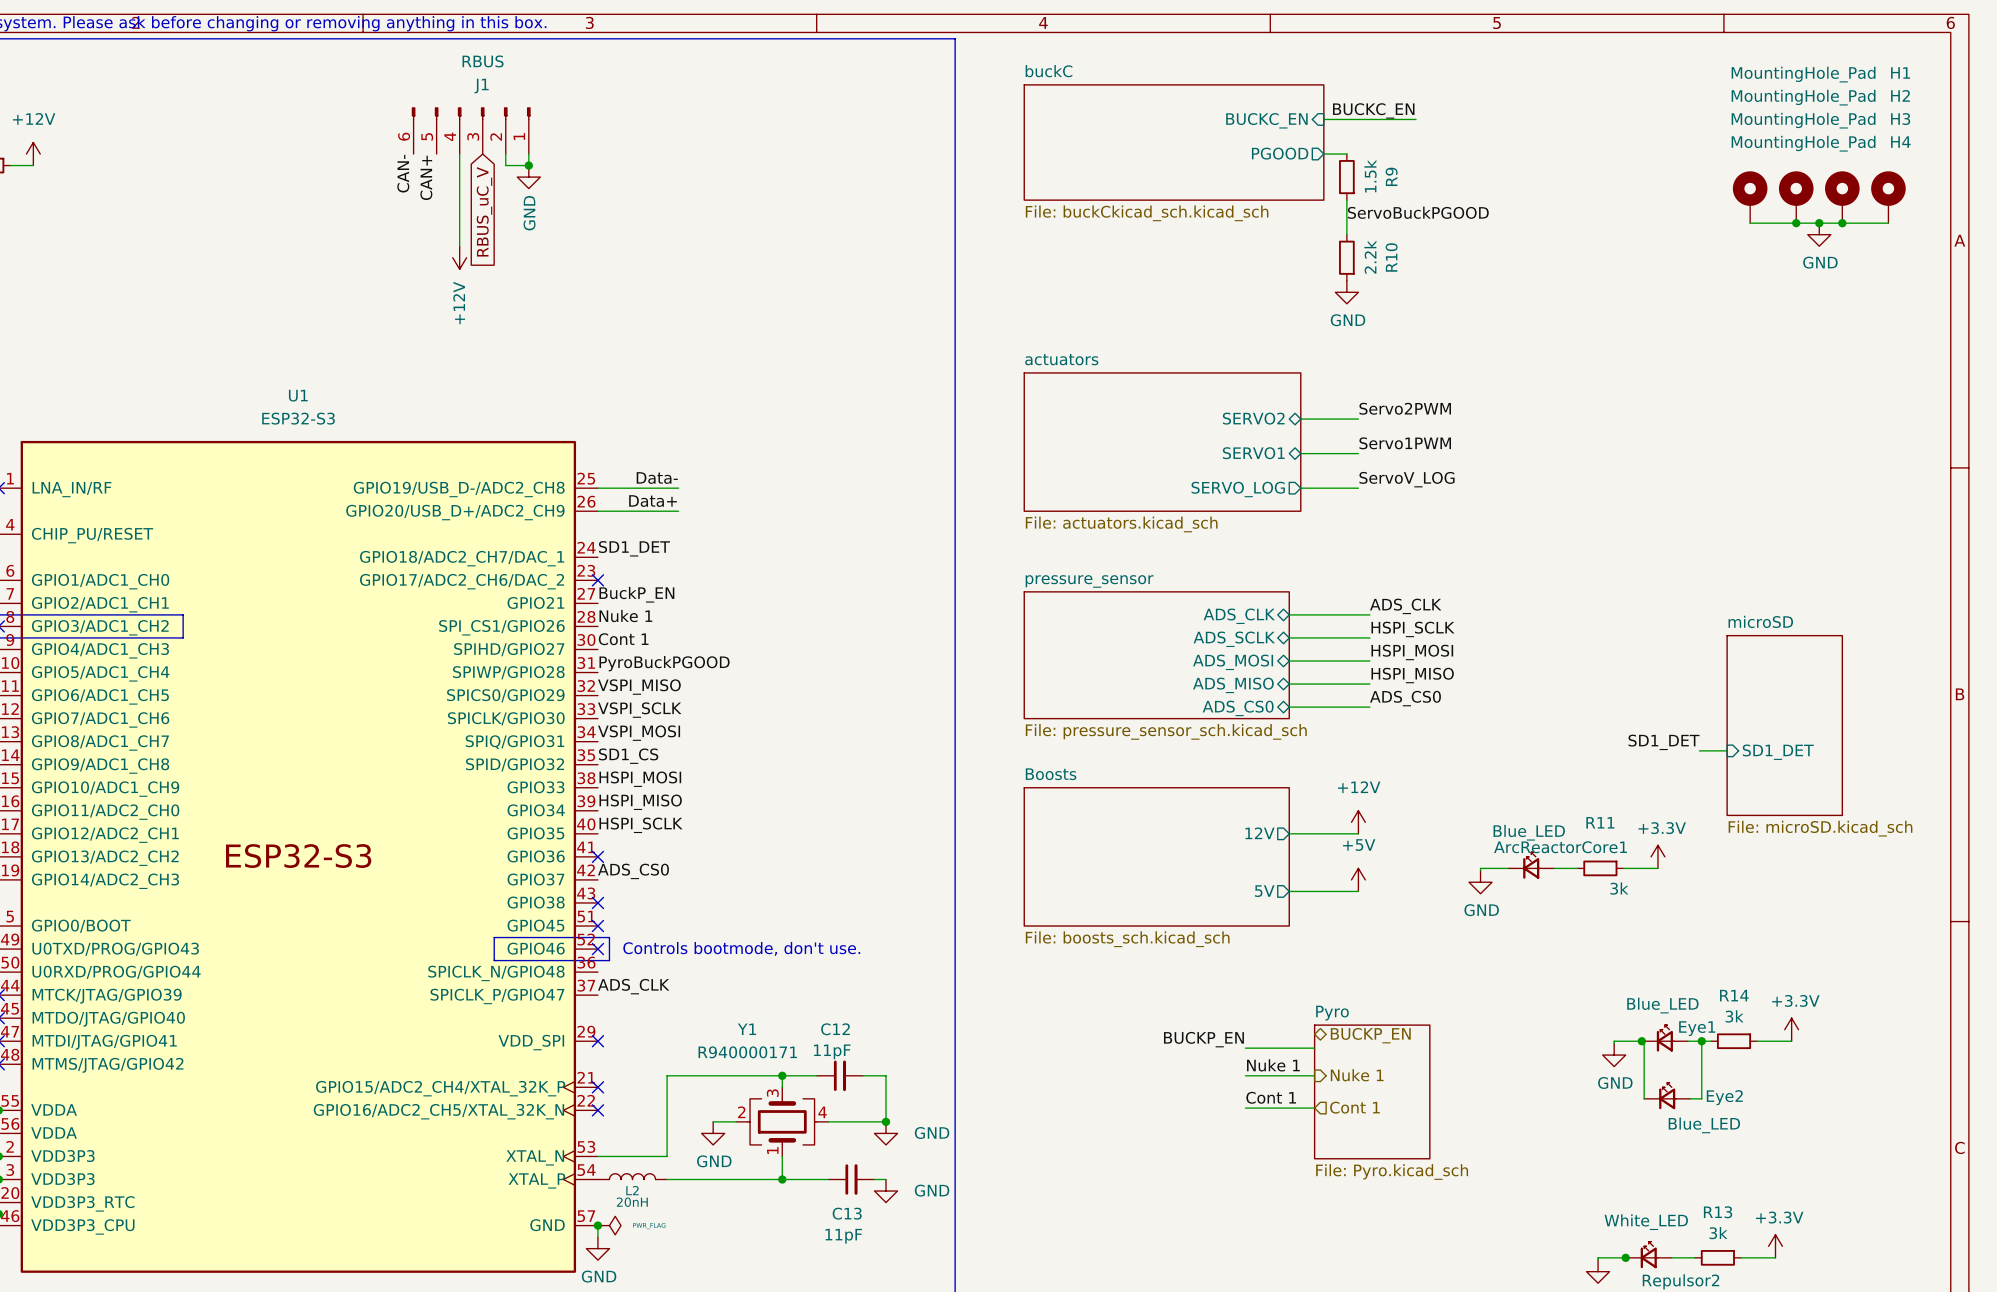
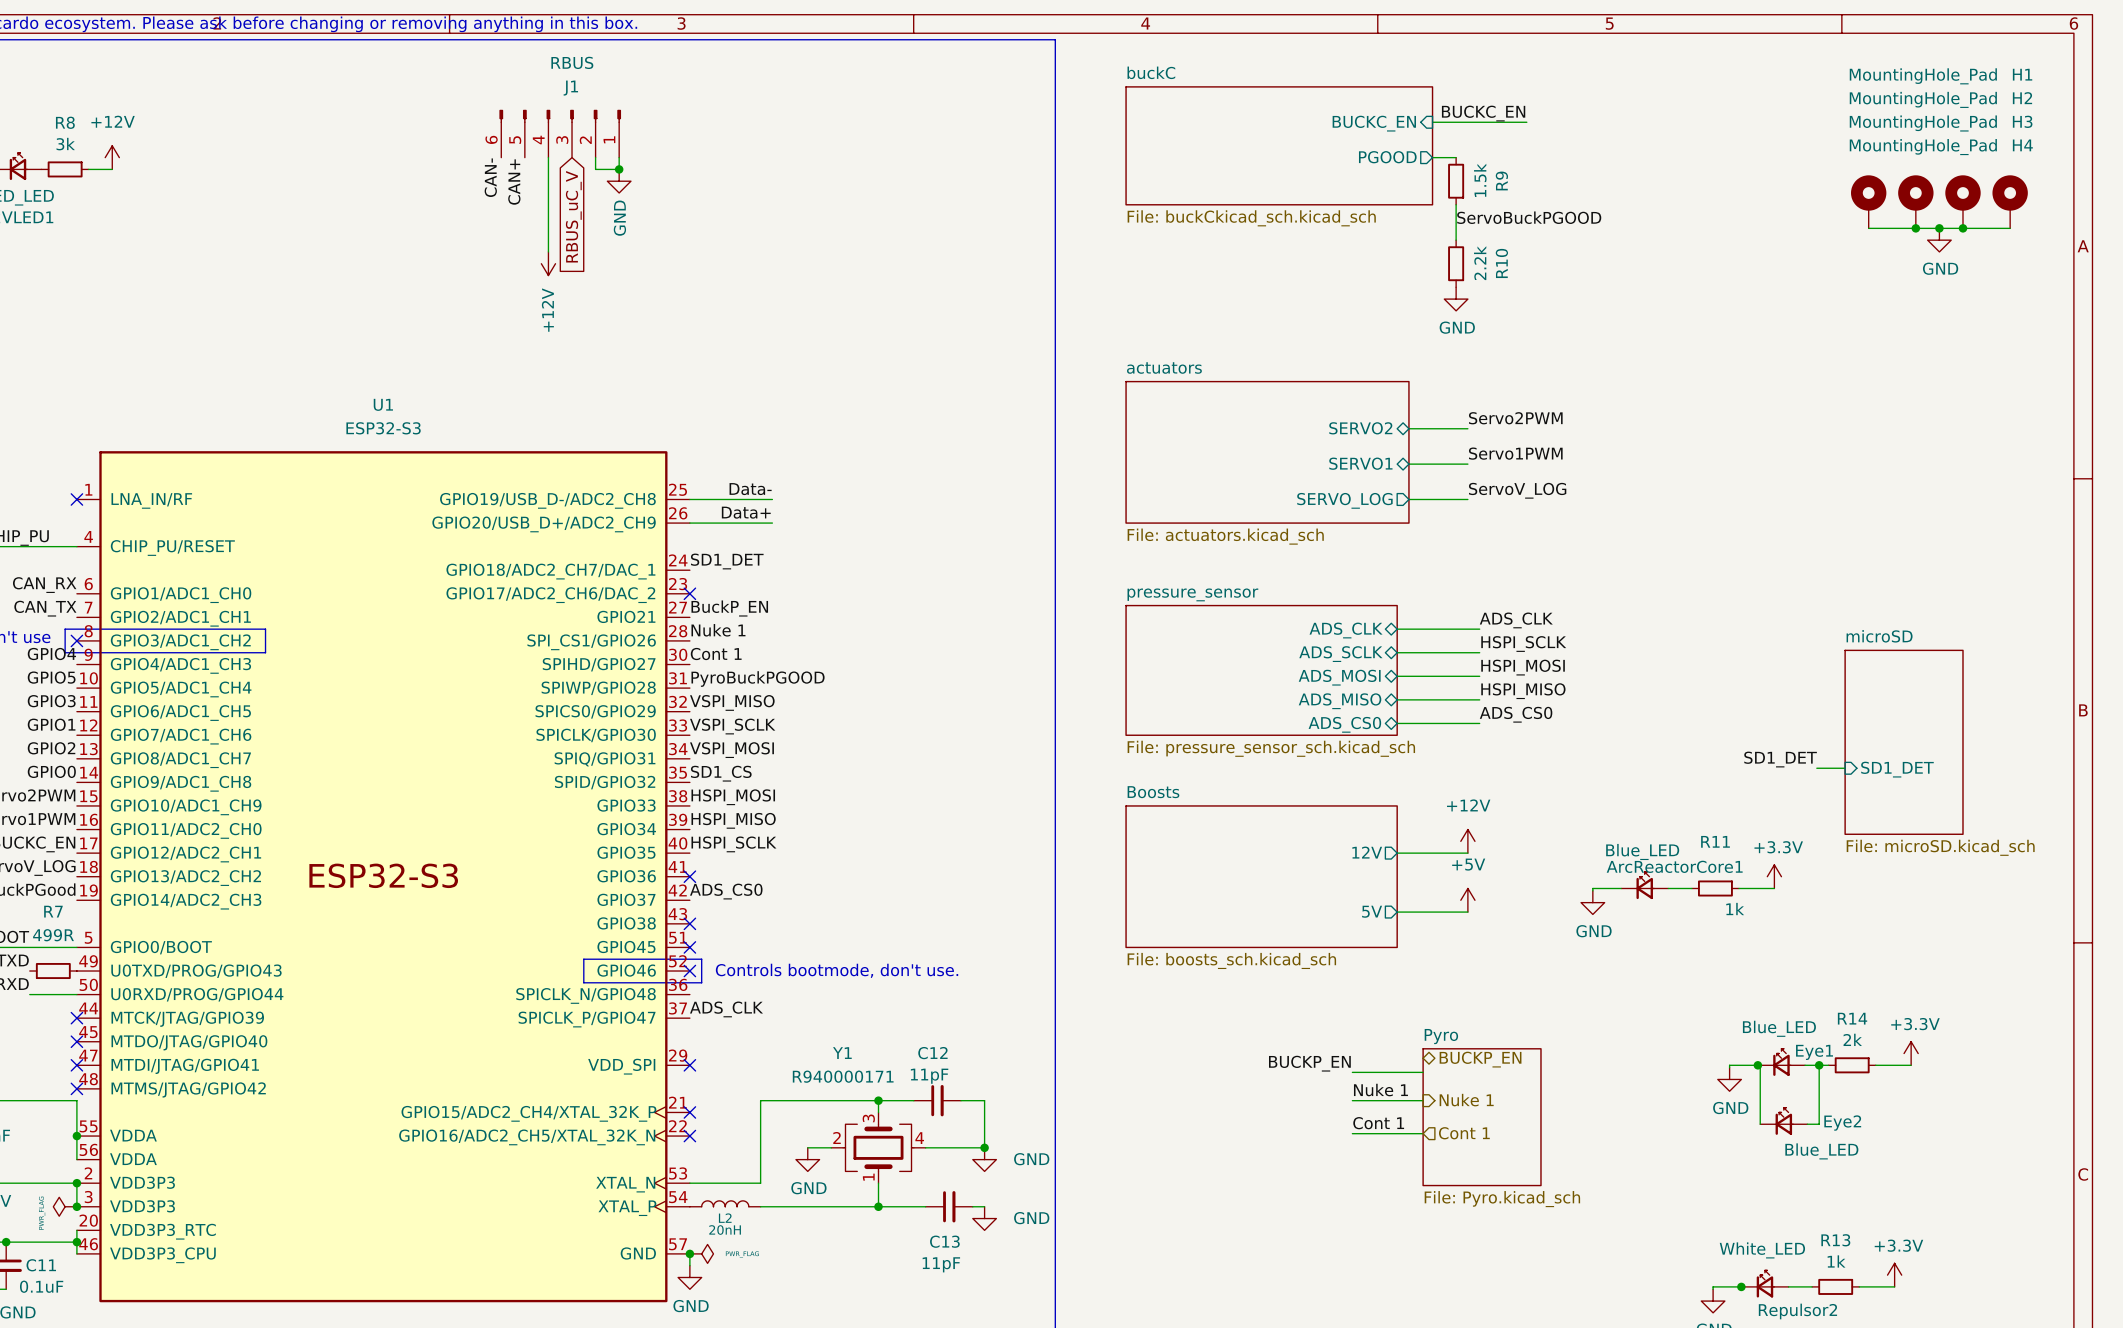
R11 value: 3k (1619, 888) -> 1k (1735, 909)
R14 value: 3k (1734, 1016) -> 2k (1852, 1039)
R13 value: 3k (1718, 1233) -> 1k (1836, 1261)

